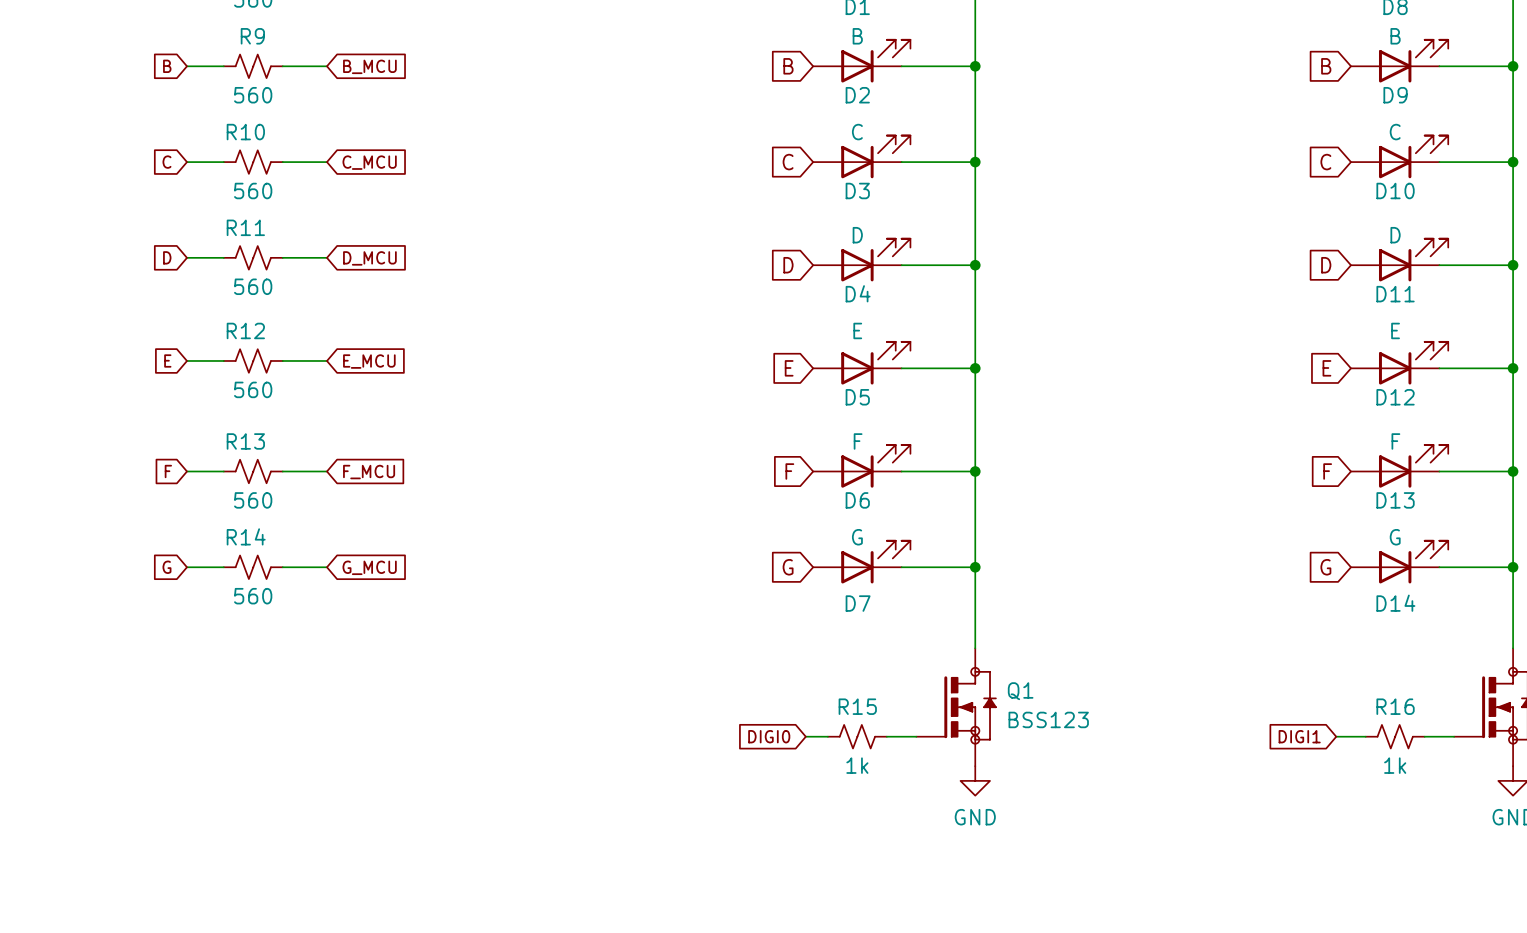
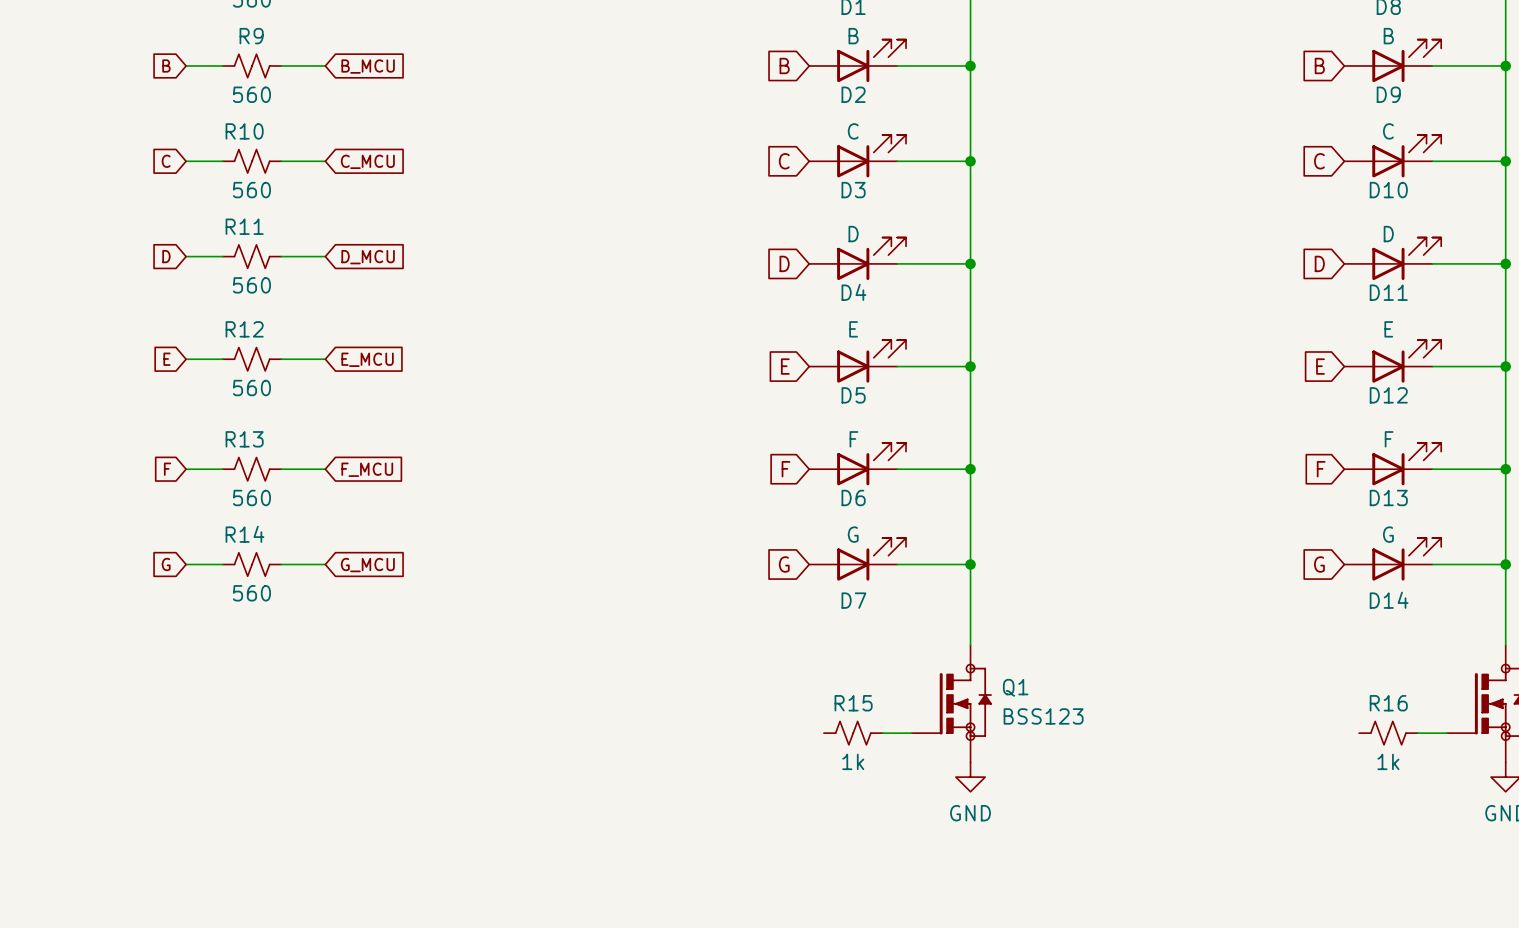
global label: DIGI0 (769, 736) -> none
wire: (805, 736) (827, 736) -> none
global label: DIGI1 (1299, 736) -> none
wire: (1336, 736) (1365, 736) -> none

